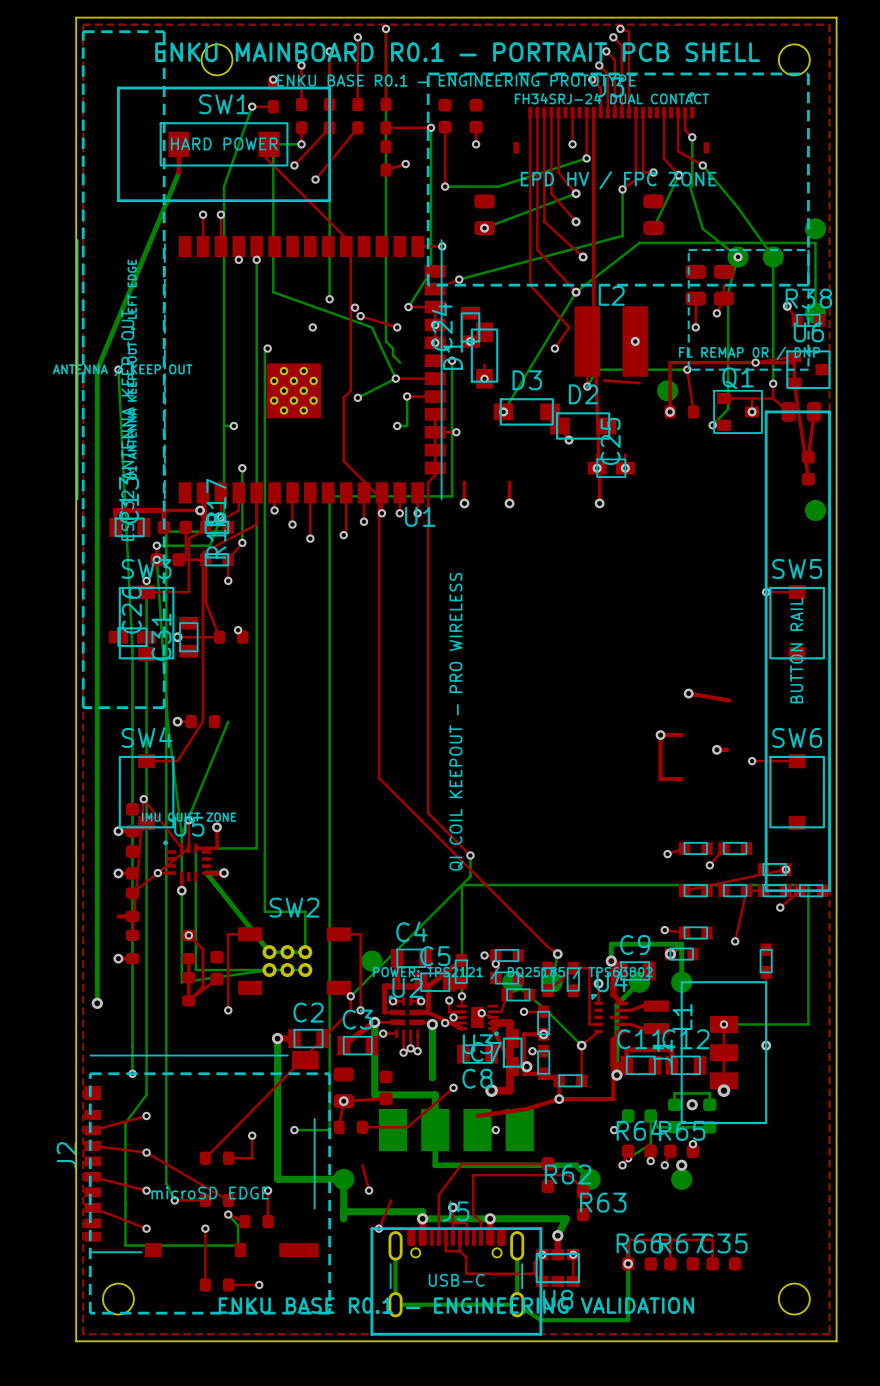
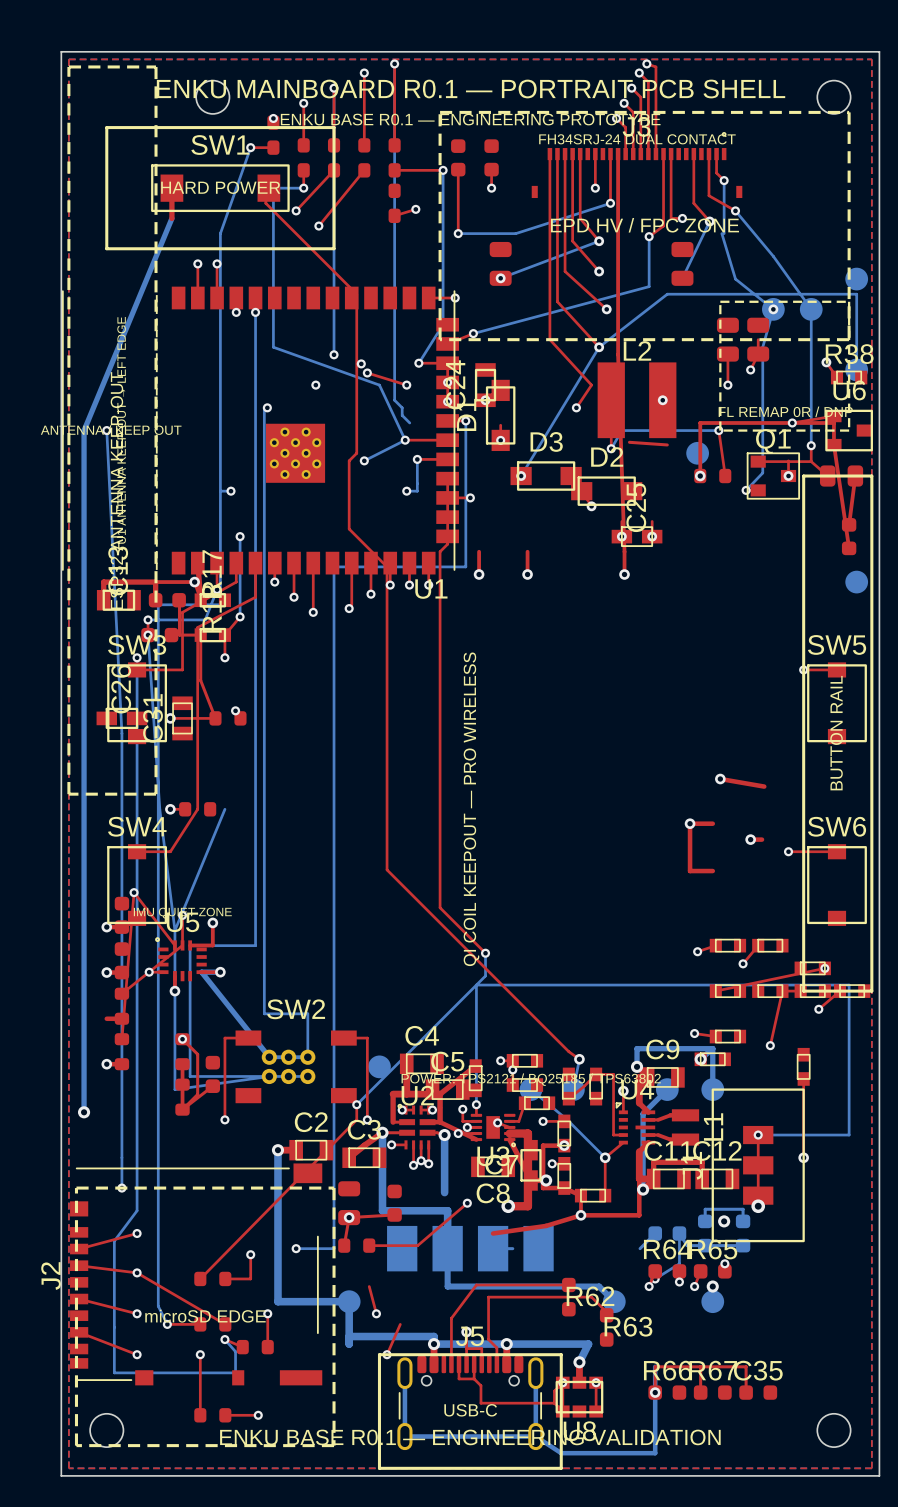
via: (495, 1130) -> none
via: (614, 1130) -> none

